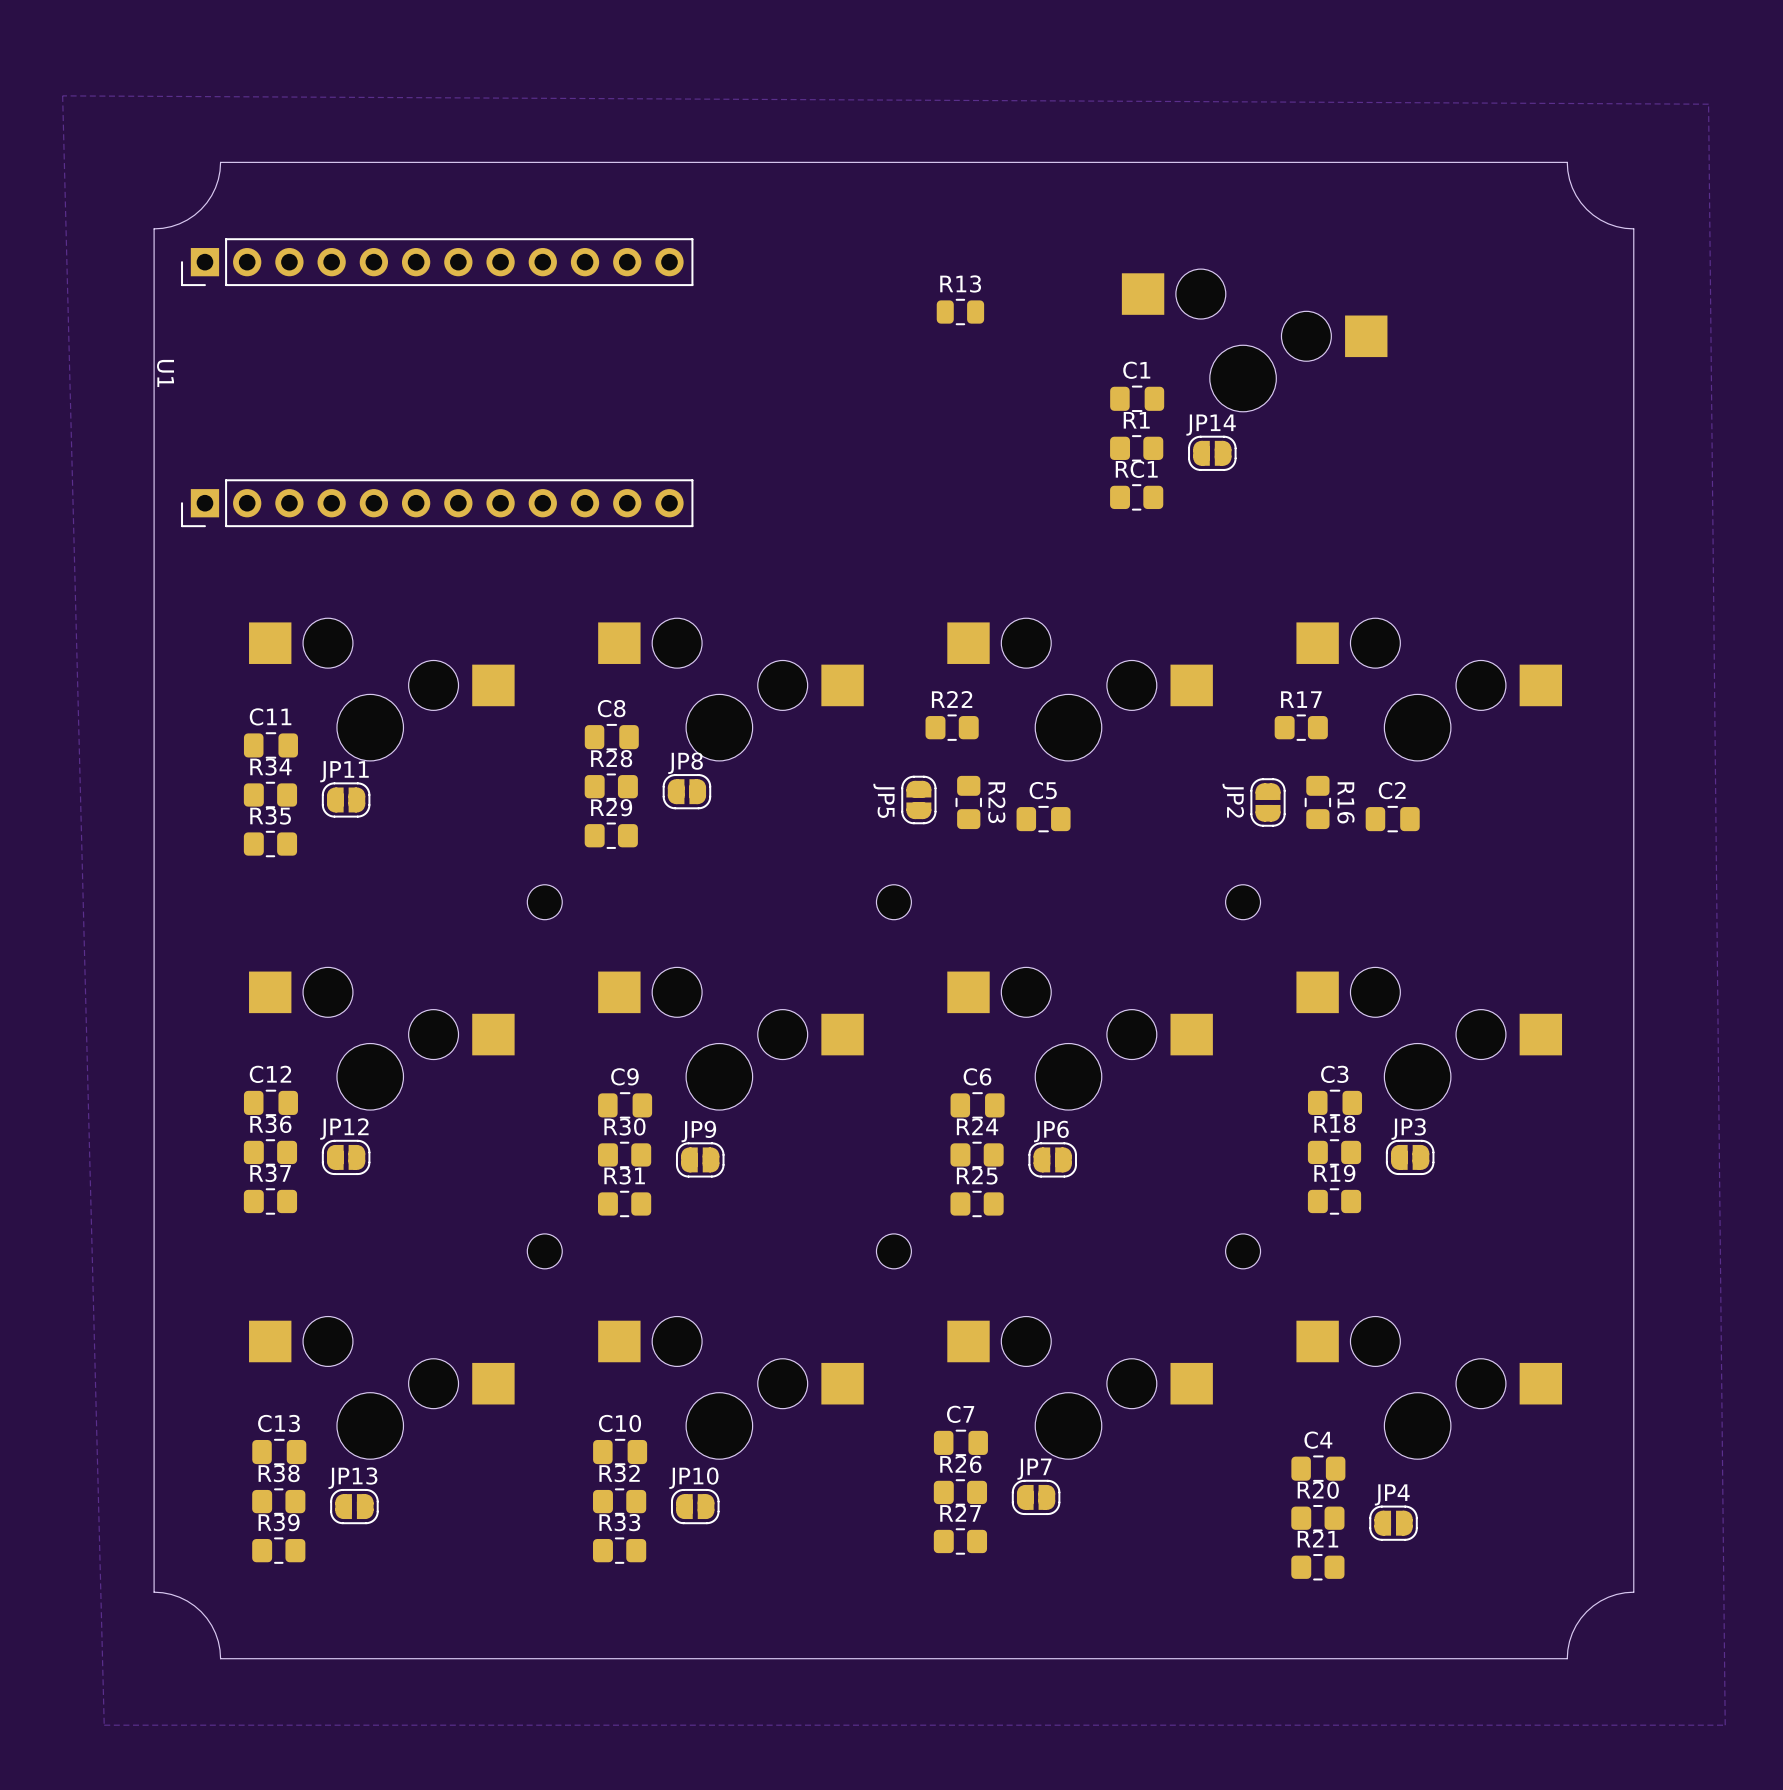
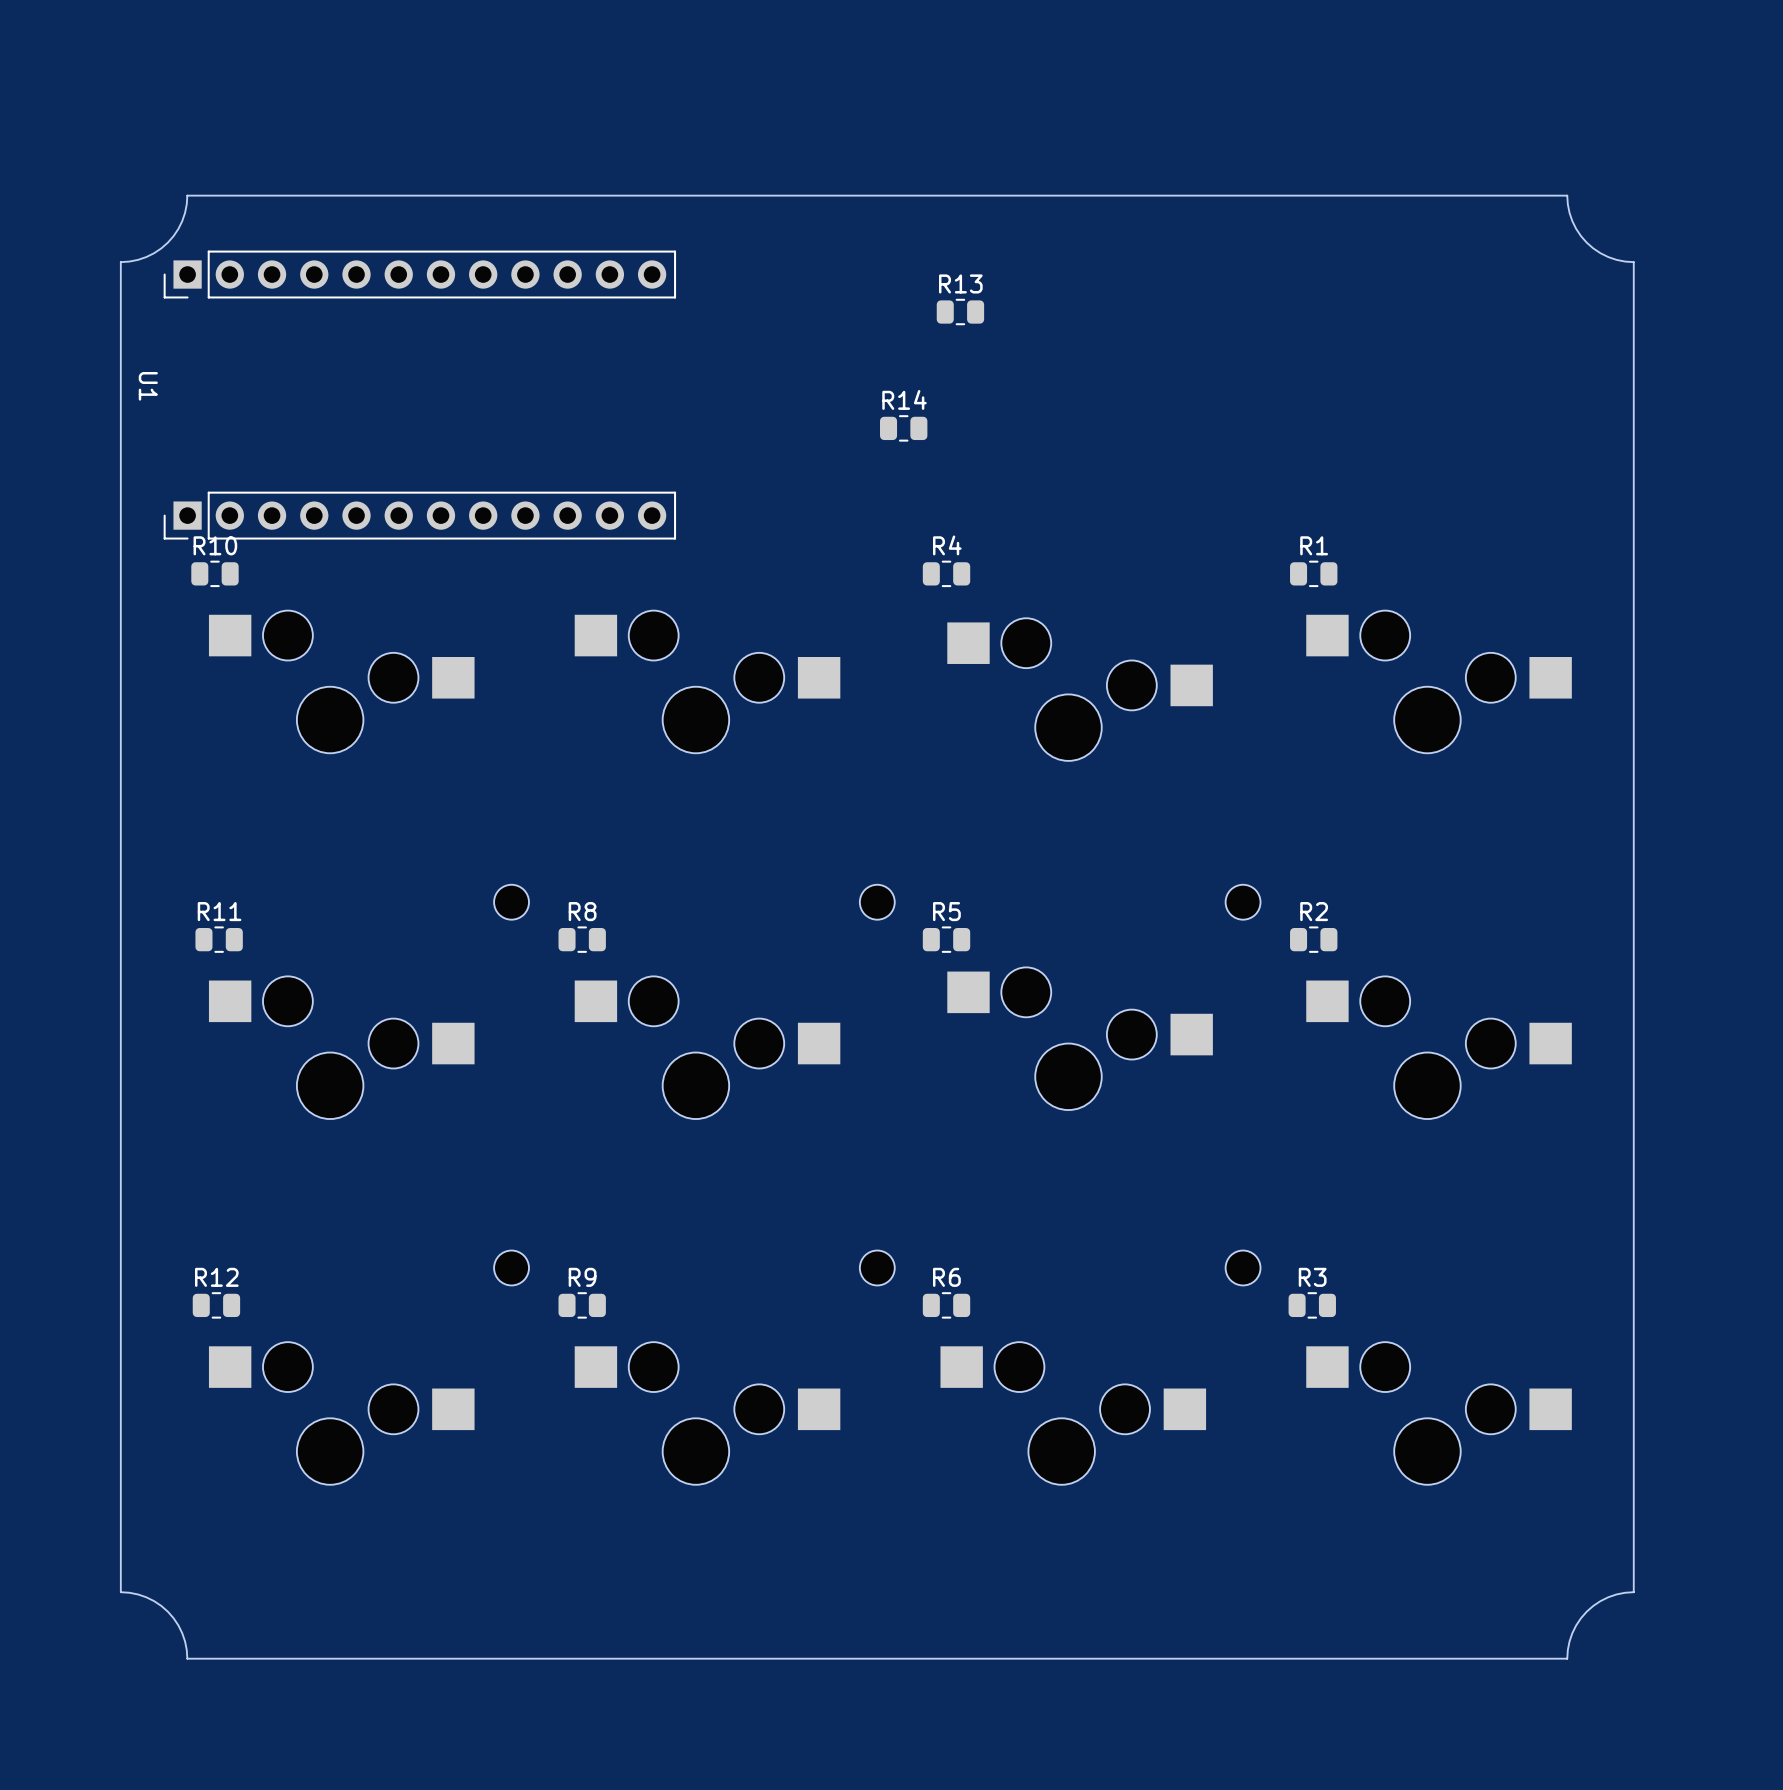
zone outline: (62, 95) (1708, 104) (1725, 1725) (104, 1725) (62, 95) -> none
board edge: (1633, 262) (1633, 228) (1608, 223) (1586, 209) (1572, 187) (1567, 162) (220, 162) (215, 187) (201, 209) (179, 223) (154, 228) (154, 1592) (179, 1597) (201, 1611) (215, 1633) (220, 1658) -> (1633, 262) (1608, 257) (1586, 242) (1572, 221) (1567, 195) (187, 195) (182, 221) (167, 242) (146, 257) (120, 262) (120, 1592) (146, 1597) (167, 1611) (182, 1633) (187, 1658) (220, 1658)
part: (1254, 340) -> none
U1 position: (437, 382) -> (419, 395)
C1: (1137, 398) -> none
R14: none -> (903, 428)
R1 footprint: [1110, 435, 1164, 462] -> [1290, 560, 1338, 588]
JP14: (1212, 453) -> none
RC1: (1136, 497) -> none
R10: none -> (214, 573)
R4: none -> (946, 573)
part position: (381, 689) -> (341, 681)
part position: (730, 689) -> (707, 681)
part position: (1429, 689) -> (1439, 681)
R22: (952, 727) -> none
R17: (1301, 727) -> none
C8: (611, 737) -> none
C11: (270, 745) -> none
R28: (611, 786) -> none
JP8: (686, 791) -> none
R34: (270, 794) -> none
JP11: (346, 799) -> none
JP5: (918, 799) -> none
R23: (968, 802) -> none
JP2: (1268, 802) -> none
R16: (1317, 802) -> none
C5: (1043, 819) -> none
C2: (1392, 819) -> none
R29: (611, 835) -> none
R35: (270, 844) -> none
part position: (544, 902) -> (511, 902)
part position: (893, 902) -> (877, 902)
R11: none -> (219, 939)
R8: none -> (582, 939)
R5: none -> (946, 939)
R2: none -> (1313, 939)
part position: (381, 1038) -> (341, 1047)
part position: (730, 1038) -> (707, 1047)
part position: (1429, 1038) -> (1439, 1047)
C12: (270, 1102) -> none
C3: (1335, 1102) -> none
C9: (625, 1105) -> none
C6: (977, 1105) -> none
R36: (270, 1152) -> none
R18: (1334, 1152) -> none
R30: (624, 1154) -> none
R24: (977, 1154) -> none
JP12: (346, 1157) -> none
JP3: (1410, 1157) -> none
JP9: (700, 1159) -> none
JP6: (1052, 1159) -> none
R37: (270, 1201) -> none
R19: (1334, 1201) -> none
R31: (624, 1203) -> none
R25: (977, 1203) -> none
part position: (544, 1251) -> (511, 1267)
part position: (893, 1251) -> (877, 1267)
part position: (1243, 1251) -> (1243, 1267)
R12: none -> (216, 1305)
R9: none -> (582, 1305)
R6: none -> (946, 1305)
R3: none -> (1312, 1305)
part position: (381, 1387) -> (341, 1413)
part position: (730, 1387) -> (707, 1413)
part position: (1080, 1387) -> (1073, 1413)
part position: (1429, 1387) -> (1439, 1413)
C7: (960, 1442) -> none
C13: (279, 1452) -> none
C10: (620, 1452) -> none
C4: (1318, 1468) -> none
R26: (960, 1492) -> none
JP7: (1036, 1497) -> none
R38: (278, 1501) -> none
R32: (619, 1501) -> none
JP13: (354, 1506) -> none
JP10: (695, 1506) -> none
R20: (1317, 1518) -> none
JP4: (1393, 1523) -> none
R27: (960, 1541) -> none
R39: (278, 1550) -> none
R33: (619, 1550) -> none
R21: (1317, 1567) -> none

